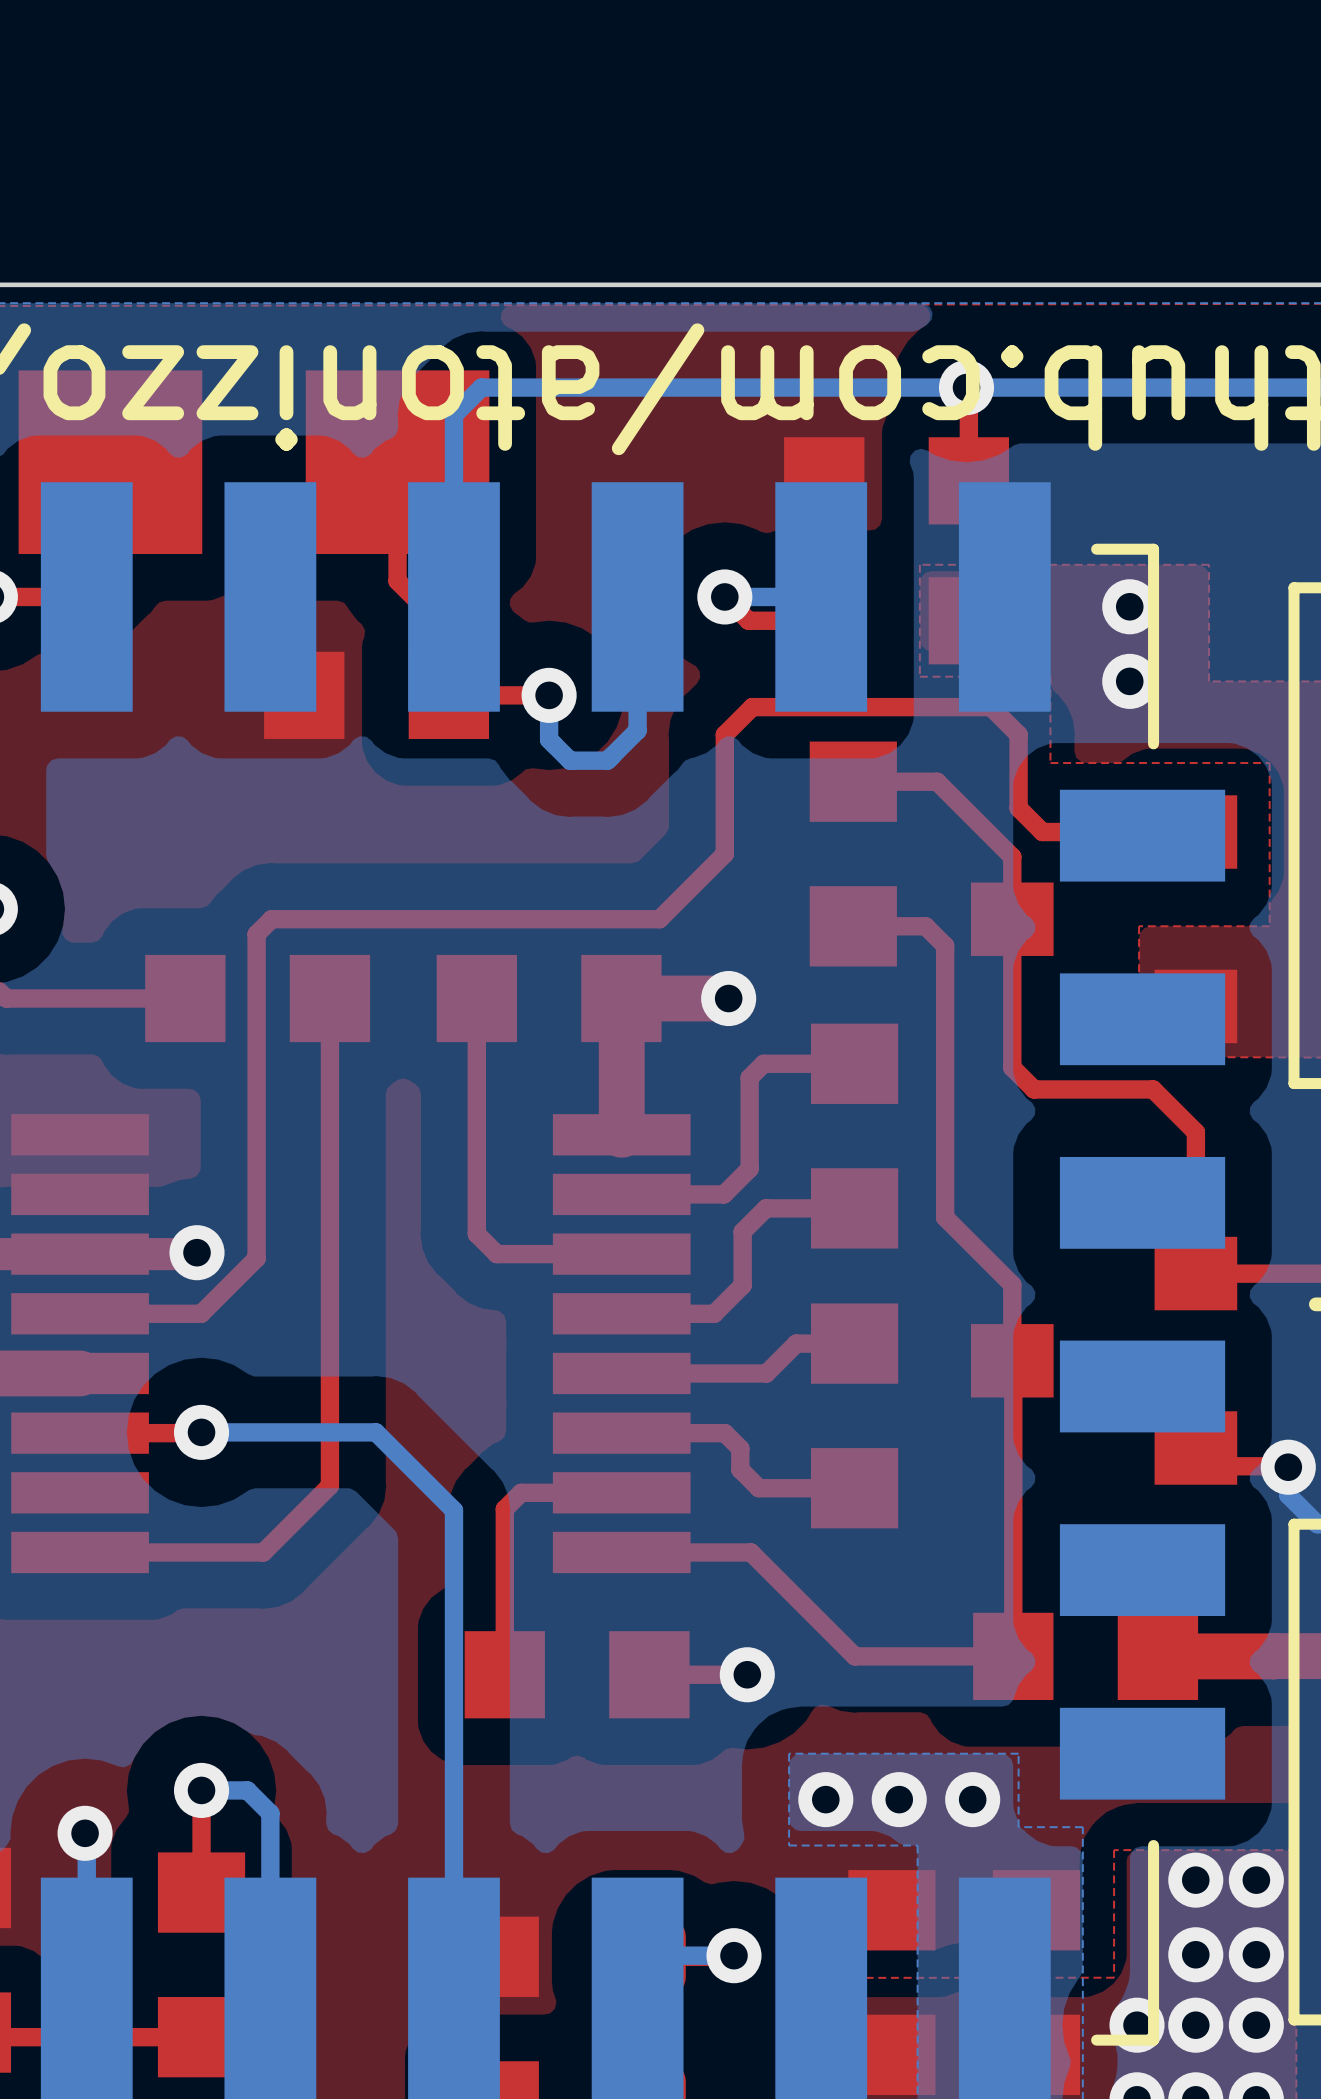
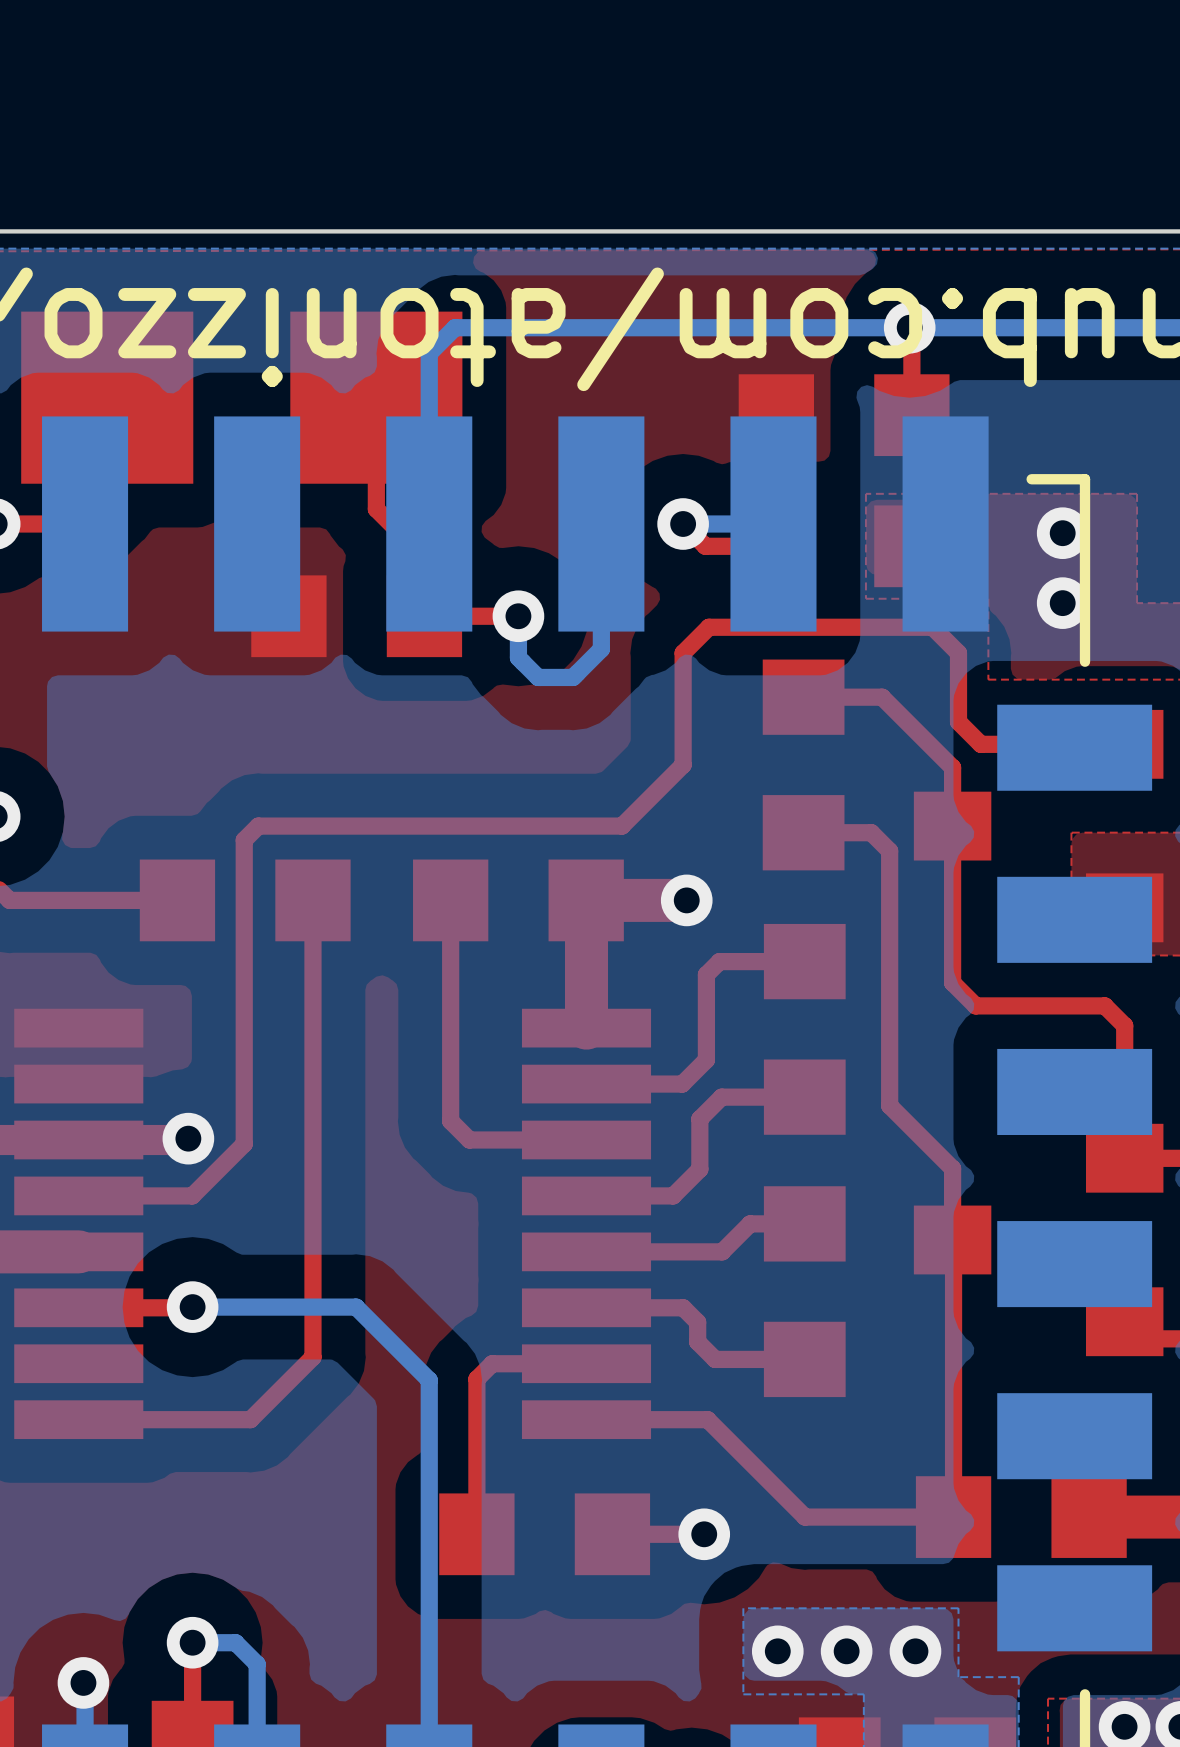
top track: (1012, 1067) (1034, 1089) (1153, 1089) (1174, 1111) -> (952, 965) (952, 982) (975, 1005) (1104, 1005)

